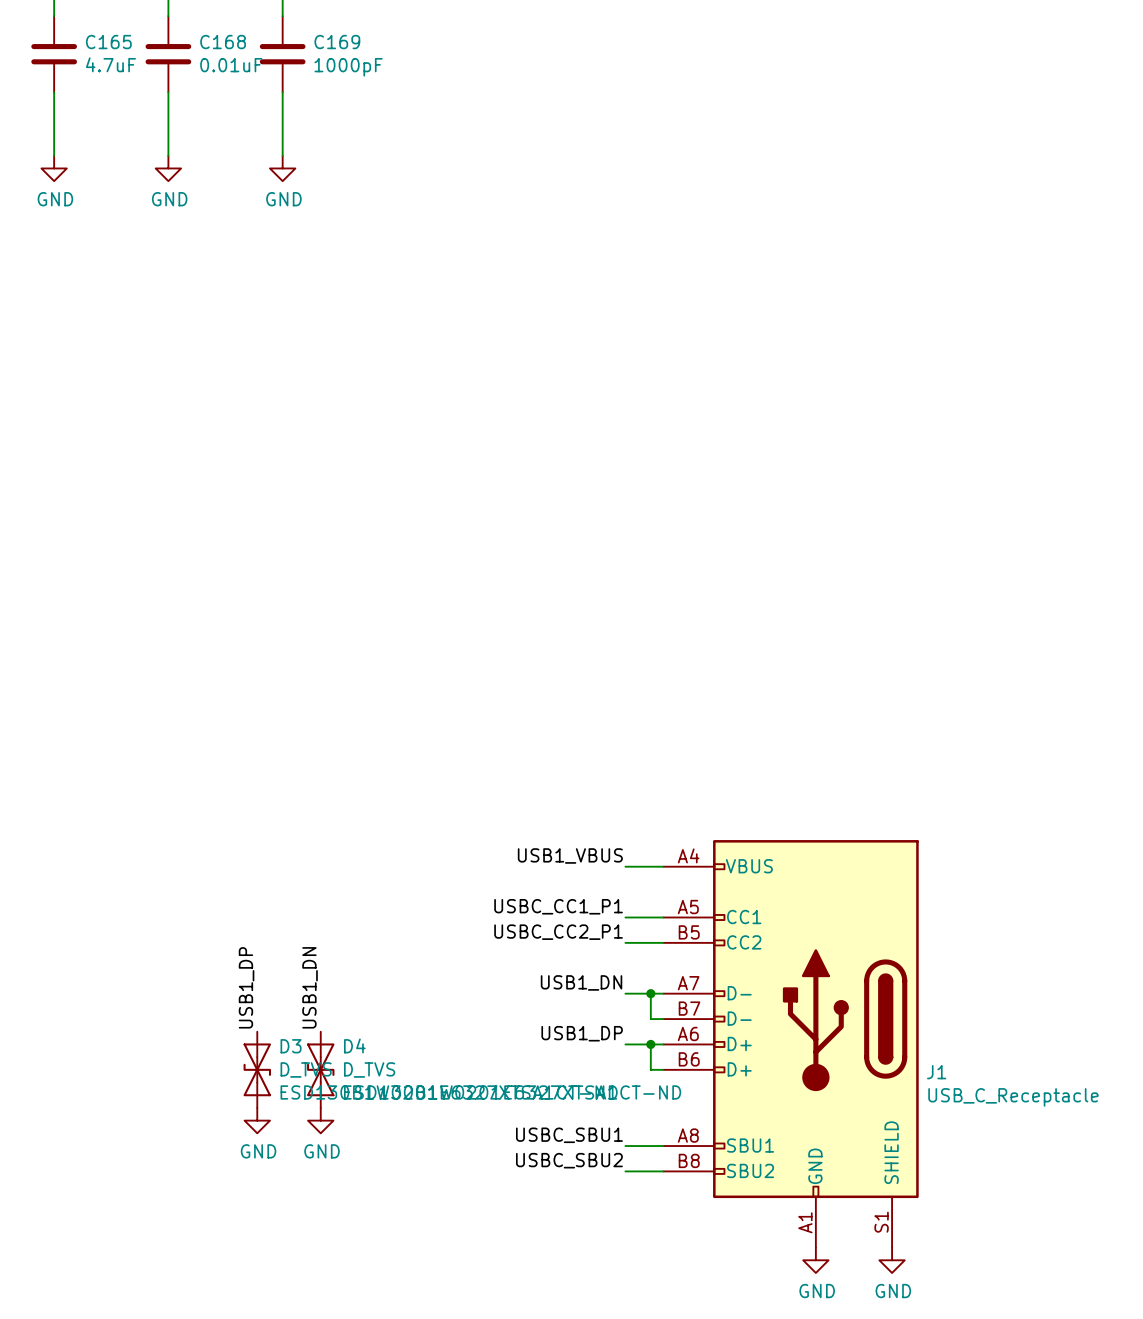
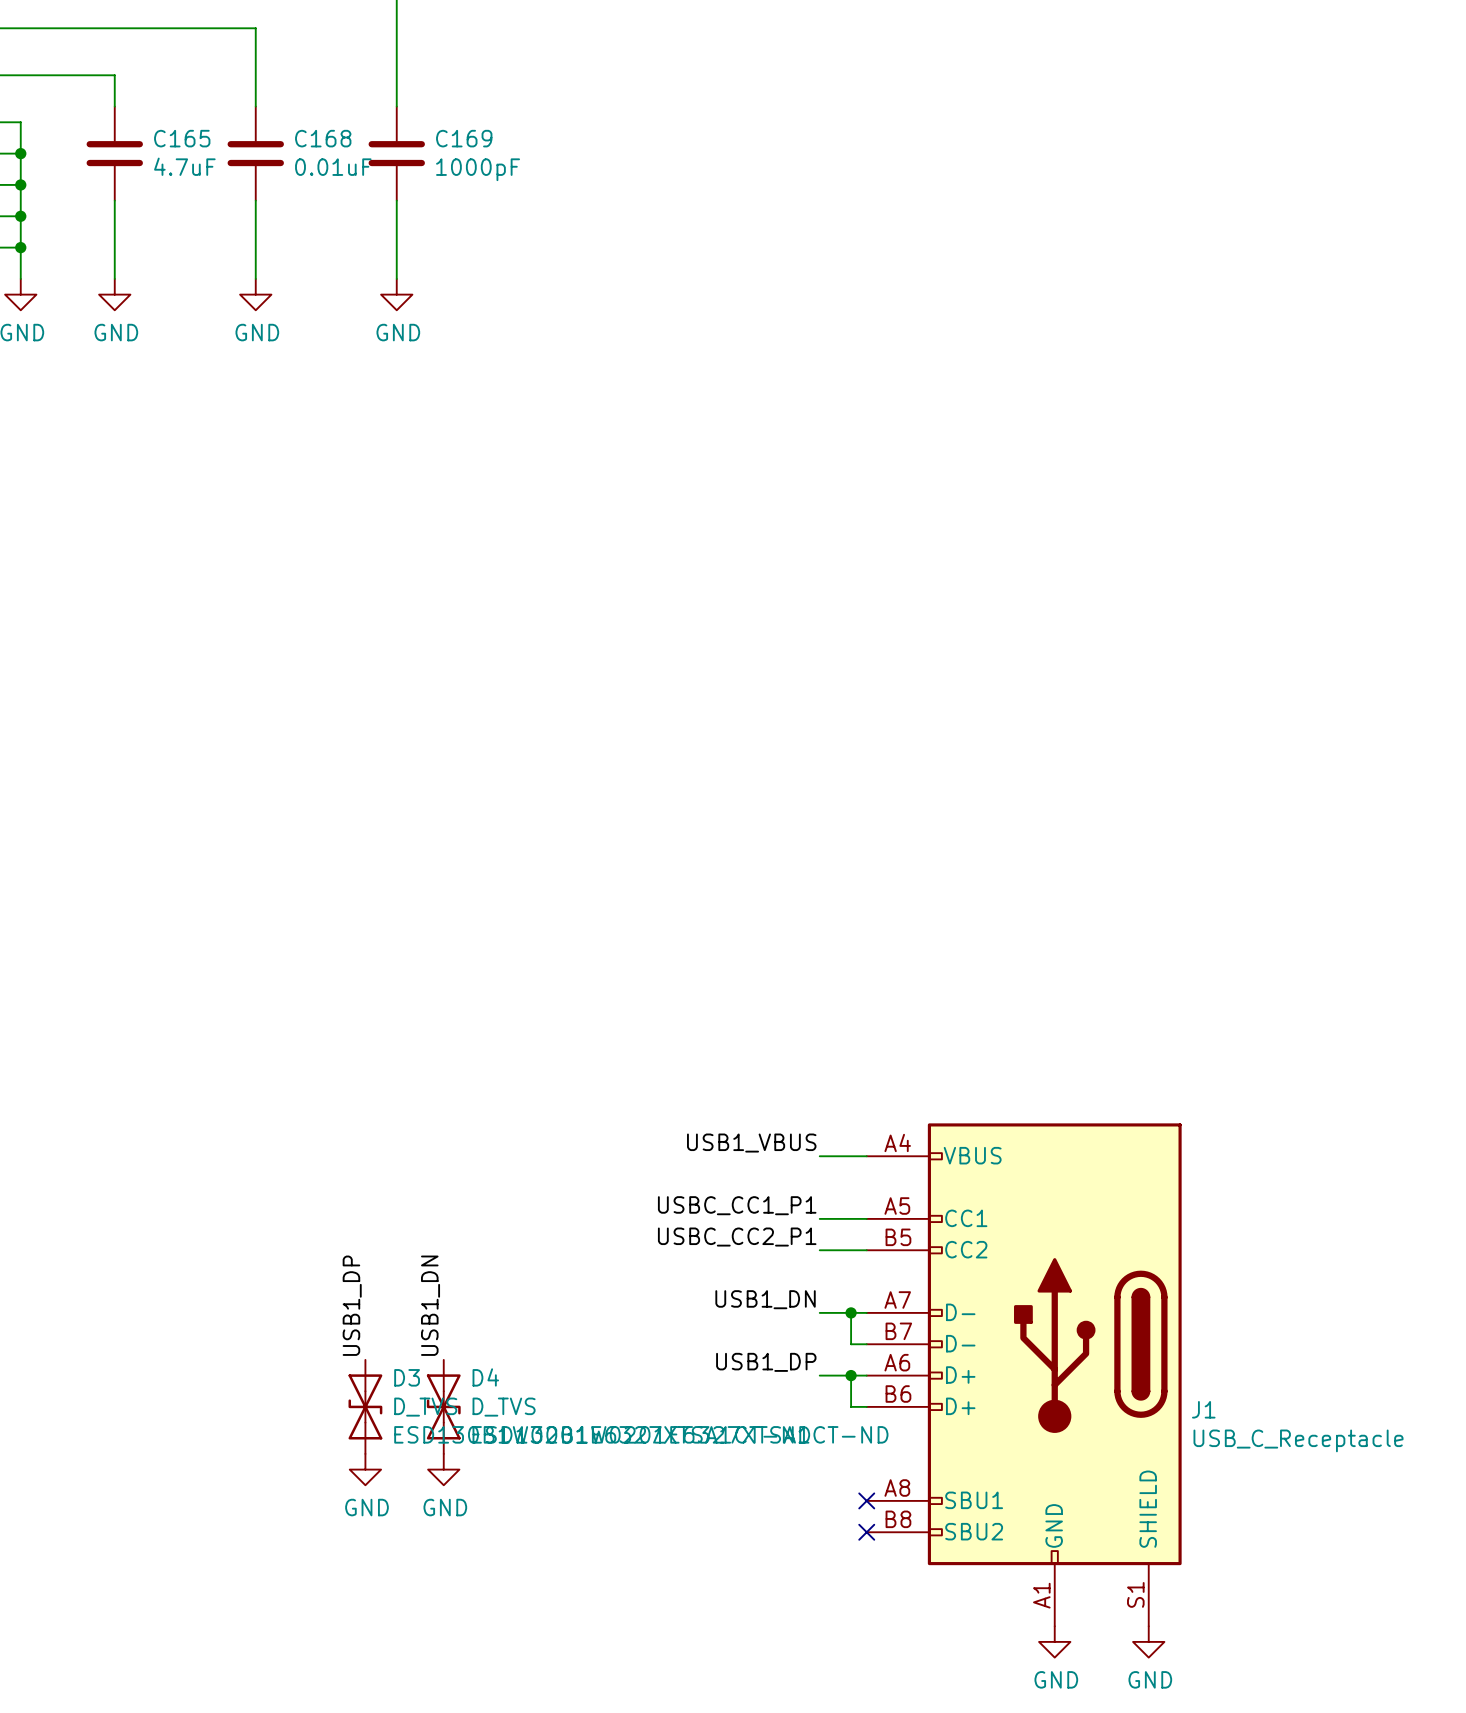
label: USBC_SBU1 (569, 1135) -> none
wire: (625, 1146) (663, 1146) -> none
no-connect mark: none -> (866, 1500)
label: USBC_SBU2 (569, 1160) -> none
wire: (625, 1171) (663, 1171) -> none
no-connect mark: none -> (866, 1532)

